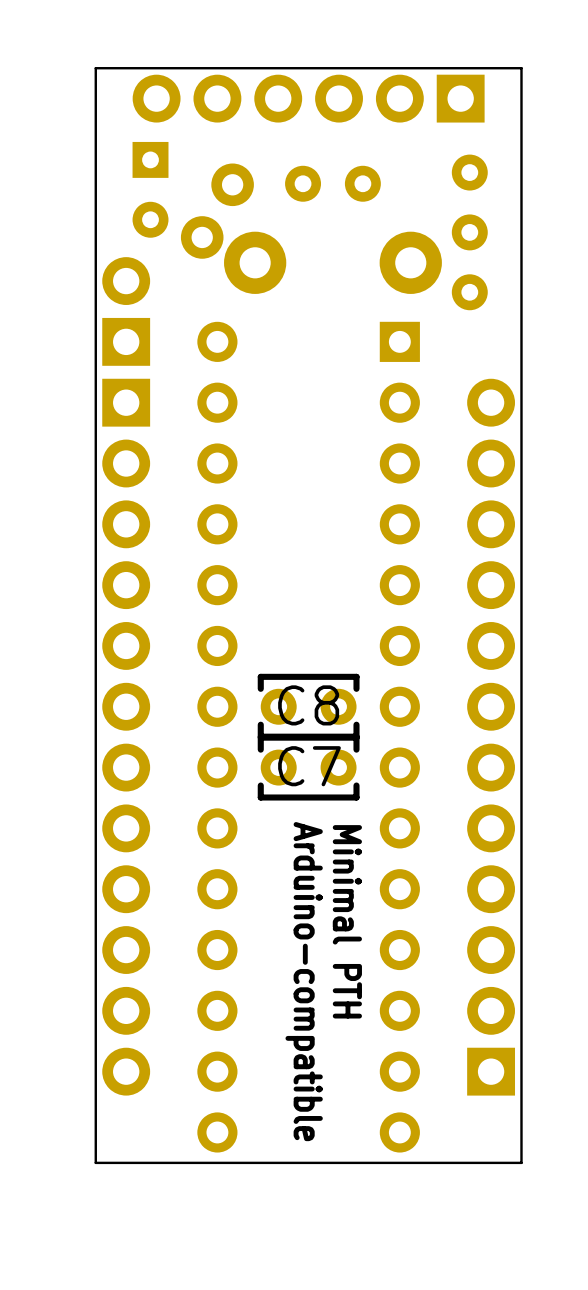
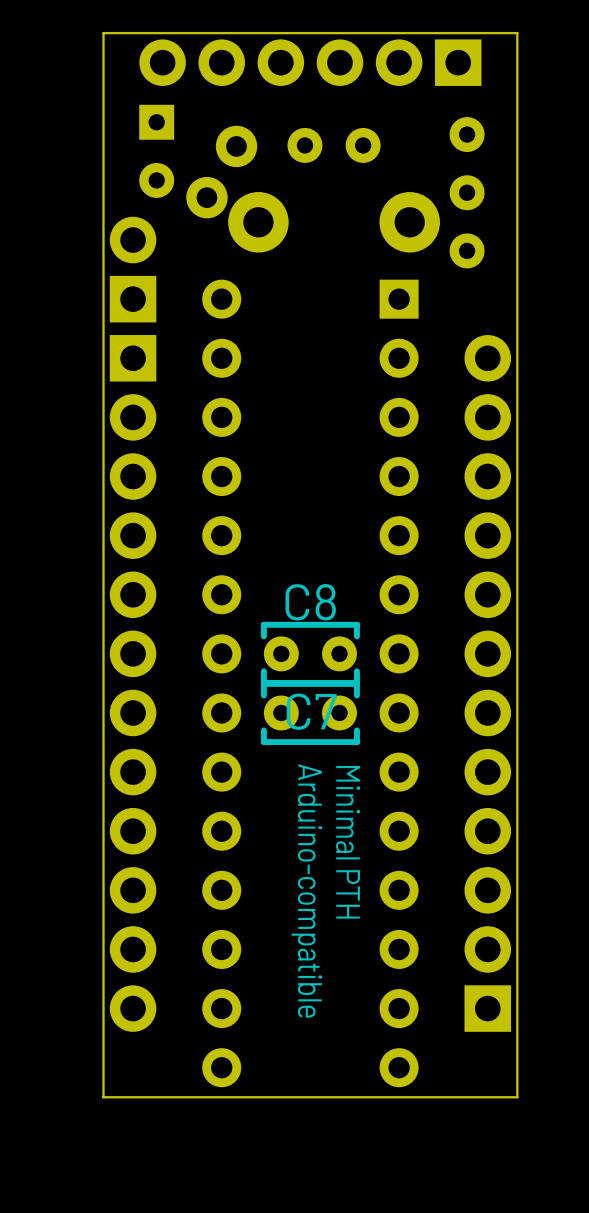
C8 name position: C8 (308, 705) -> C8 (310, 602)

